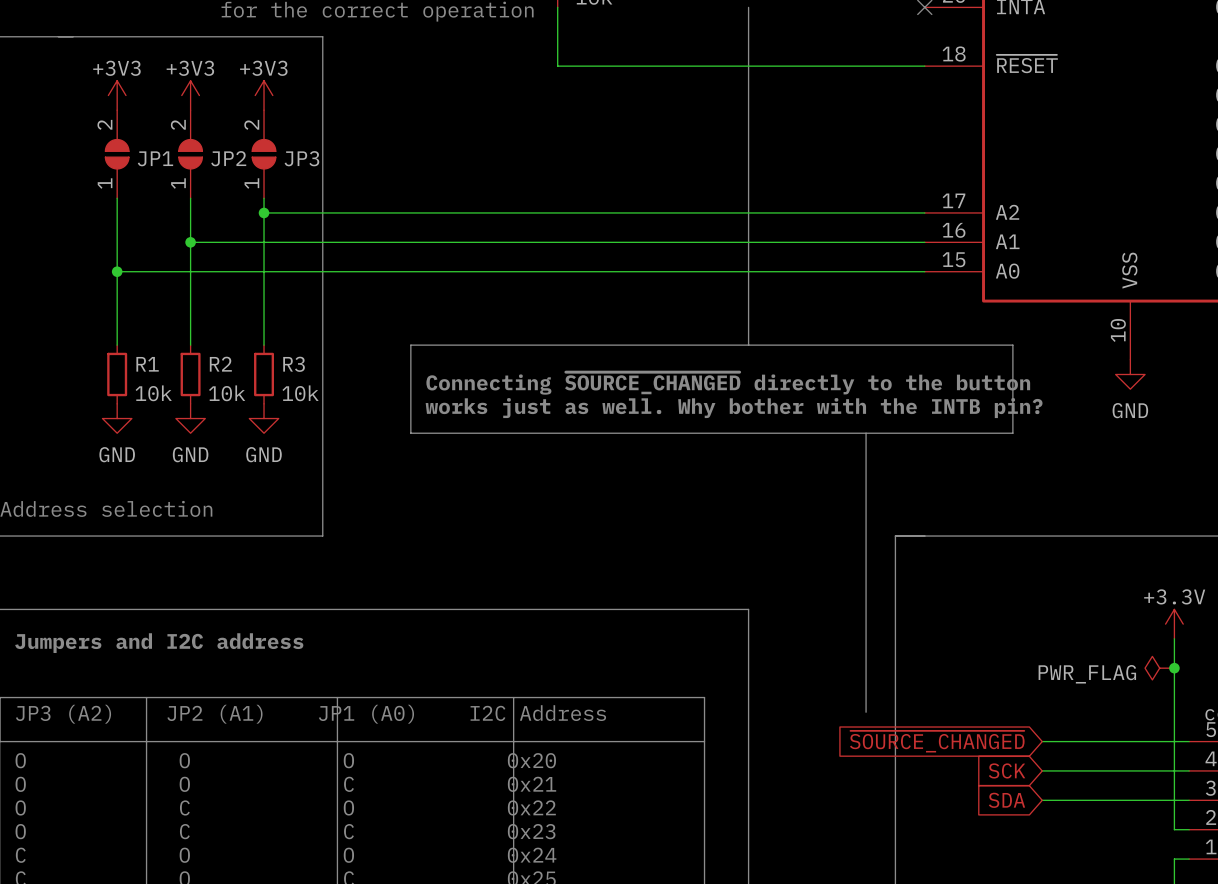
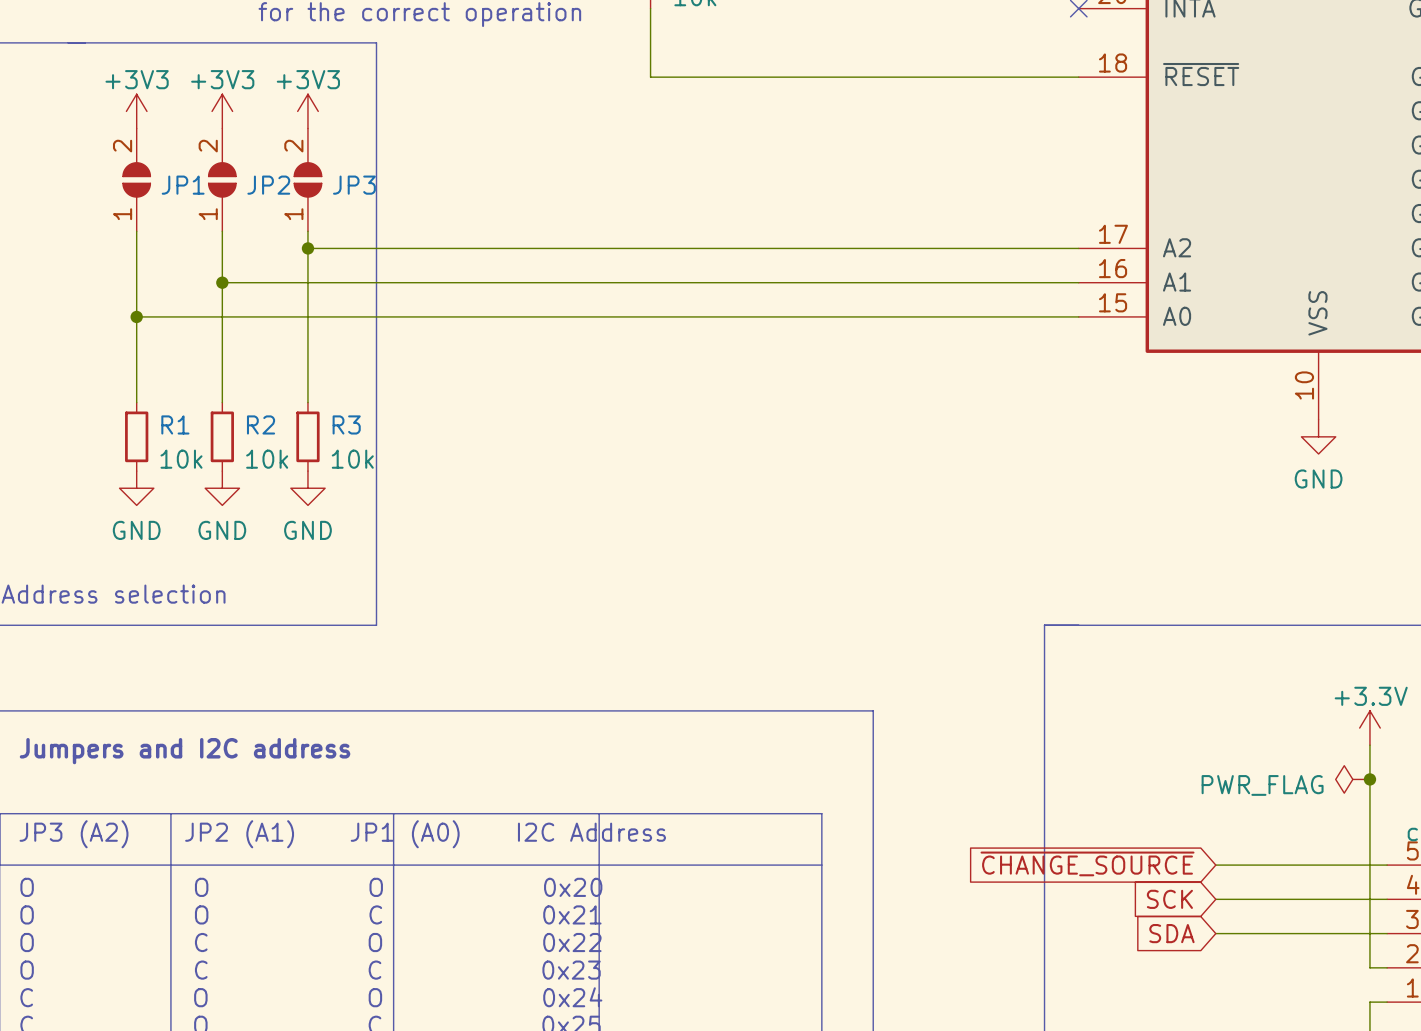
line: (748, 7) (748, 345) -> none
line: (410, 345) (410, 433) (1012, 433) (1012, 345) (410, 345) -> none
text: Connecting ~{SOURCE_CHANGED} directly to the button (728, 383) -> none
text: works just as well. Why bother with the INTB pin? (734, 408) -> none
line: (866, 433) (866, 712) -> none
global label: ~{SOURCE_CHANGED} (937, 741) -> ~{CHANGE_SOURCE} (1087, 863)

